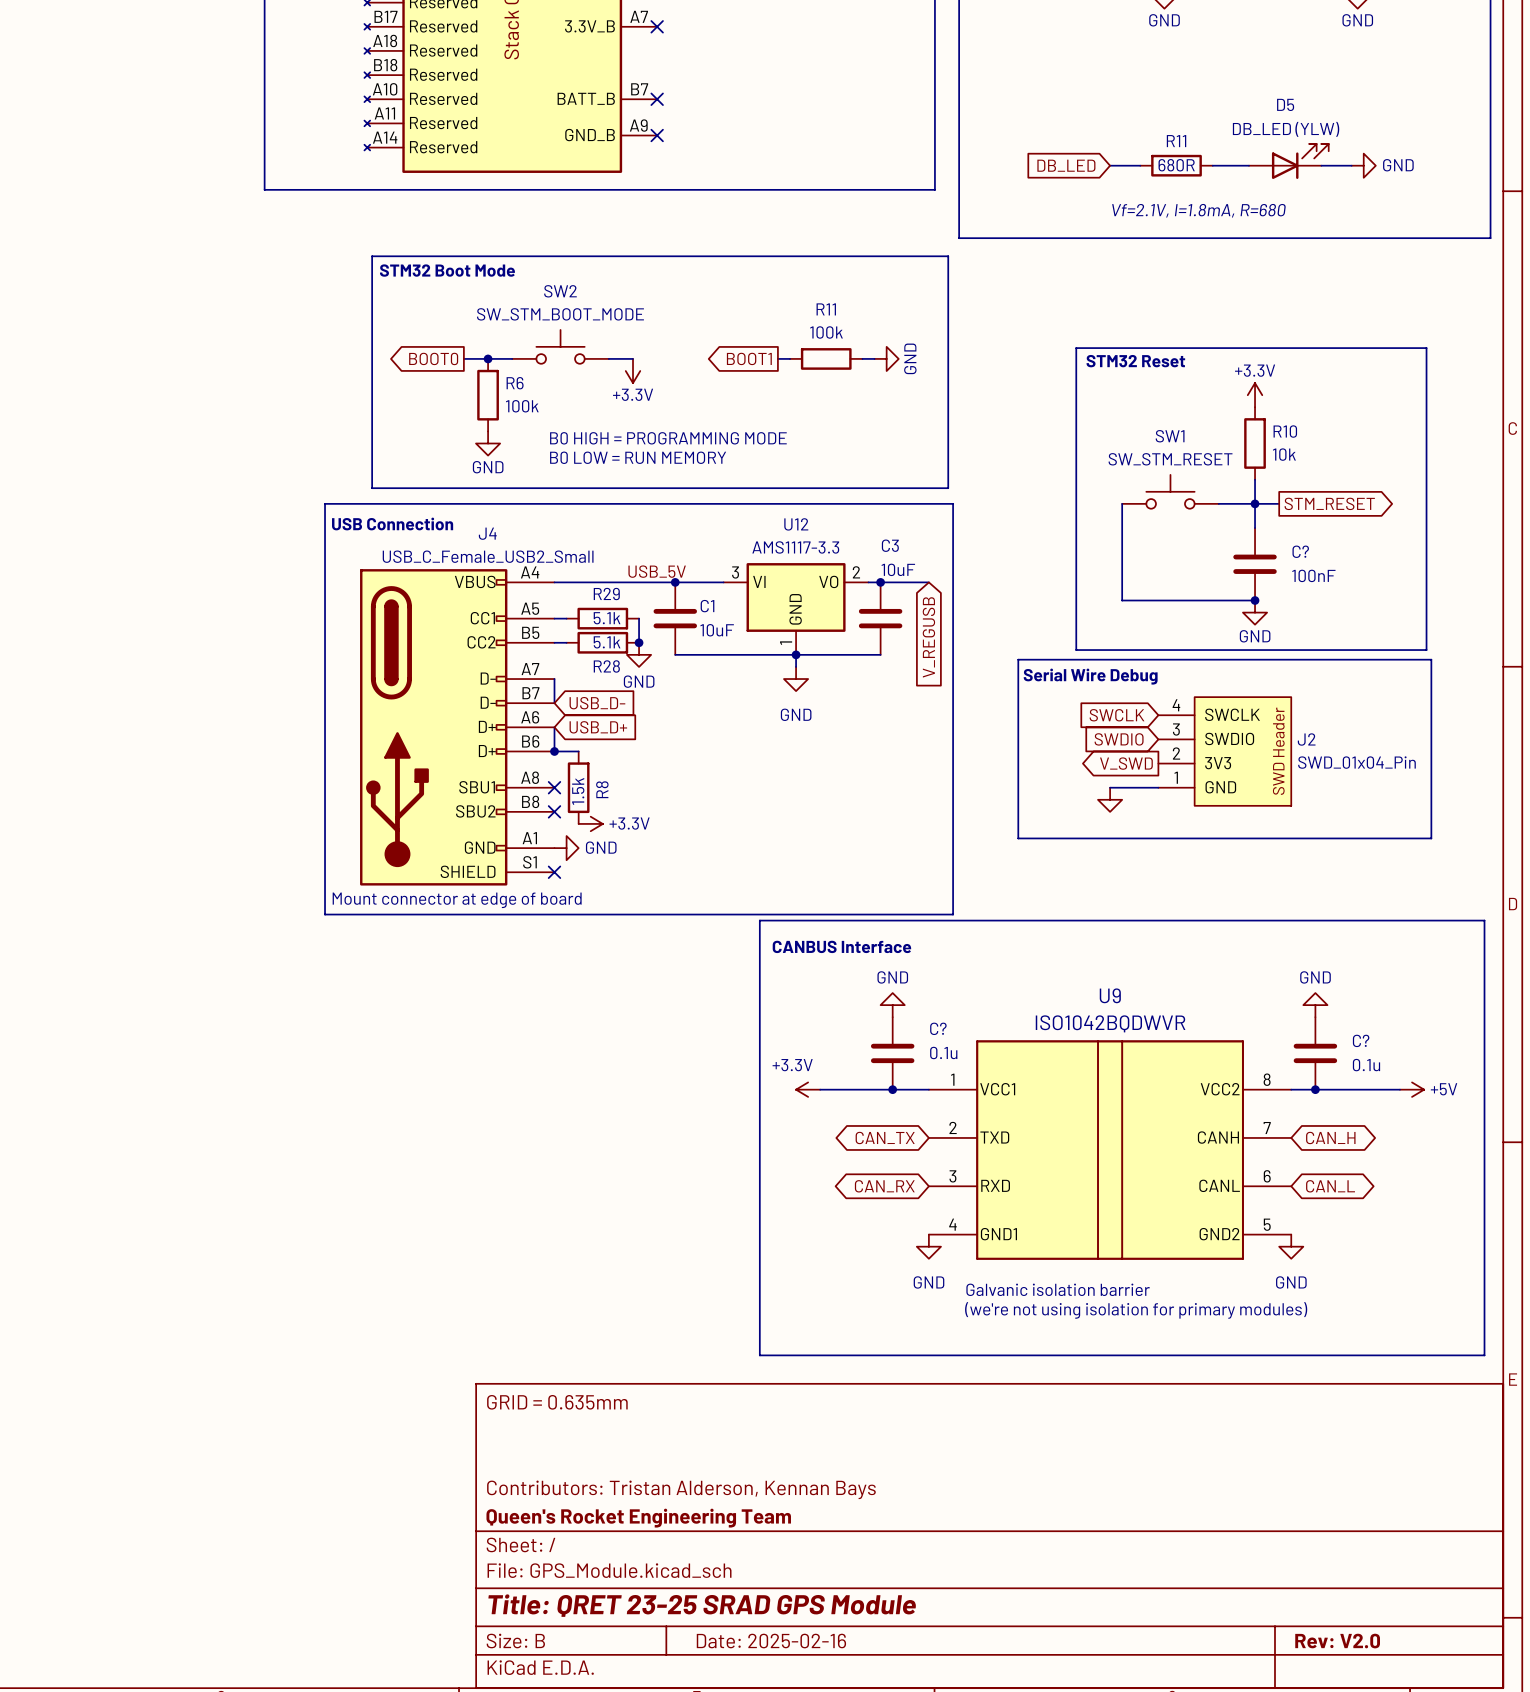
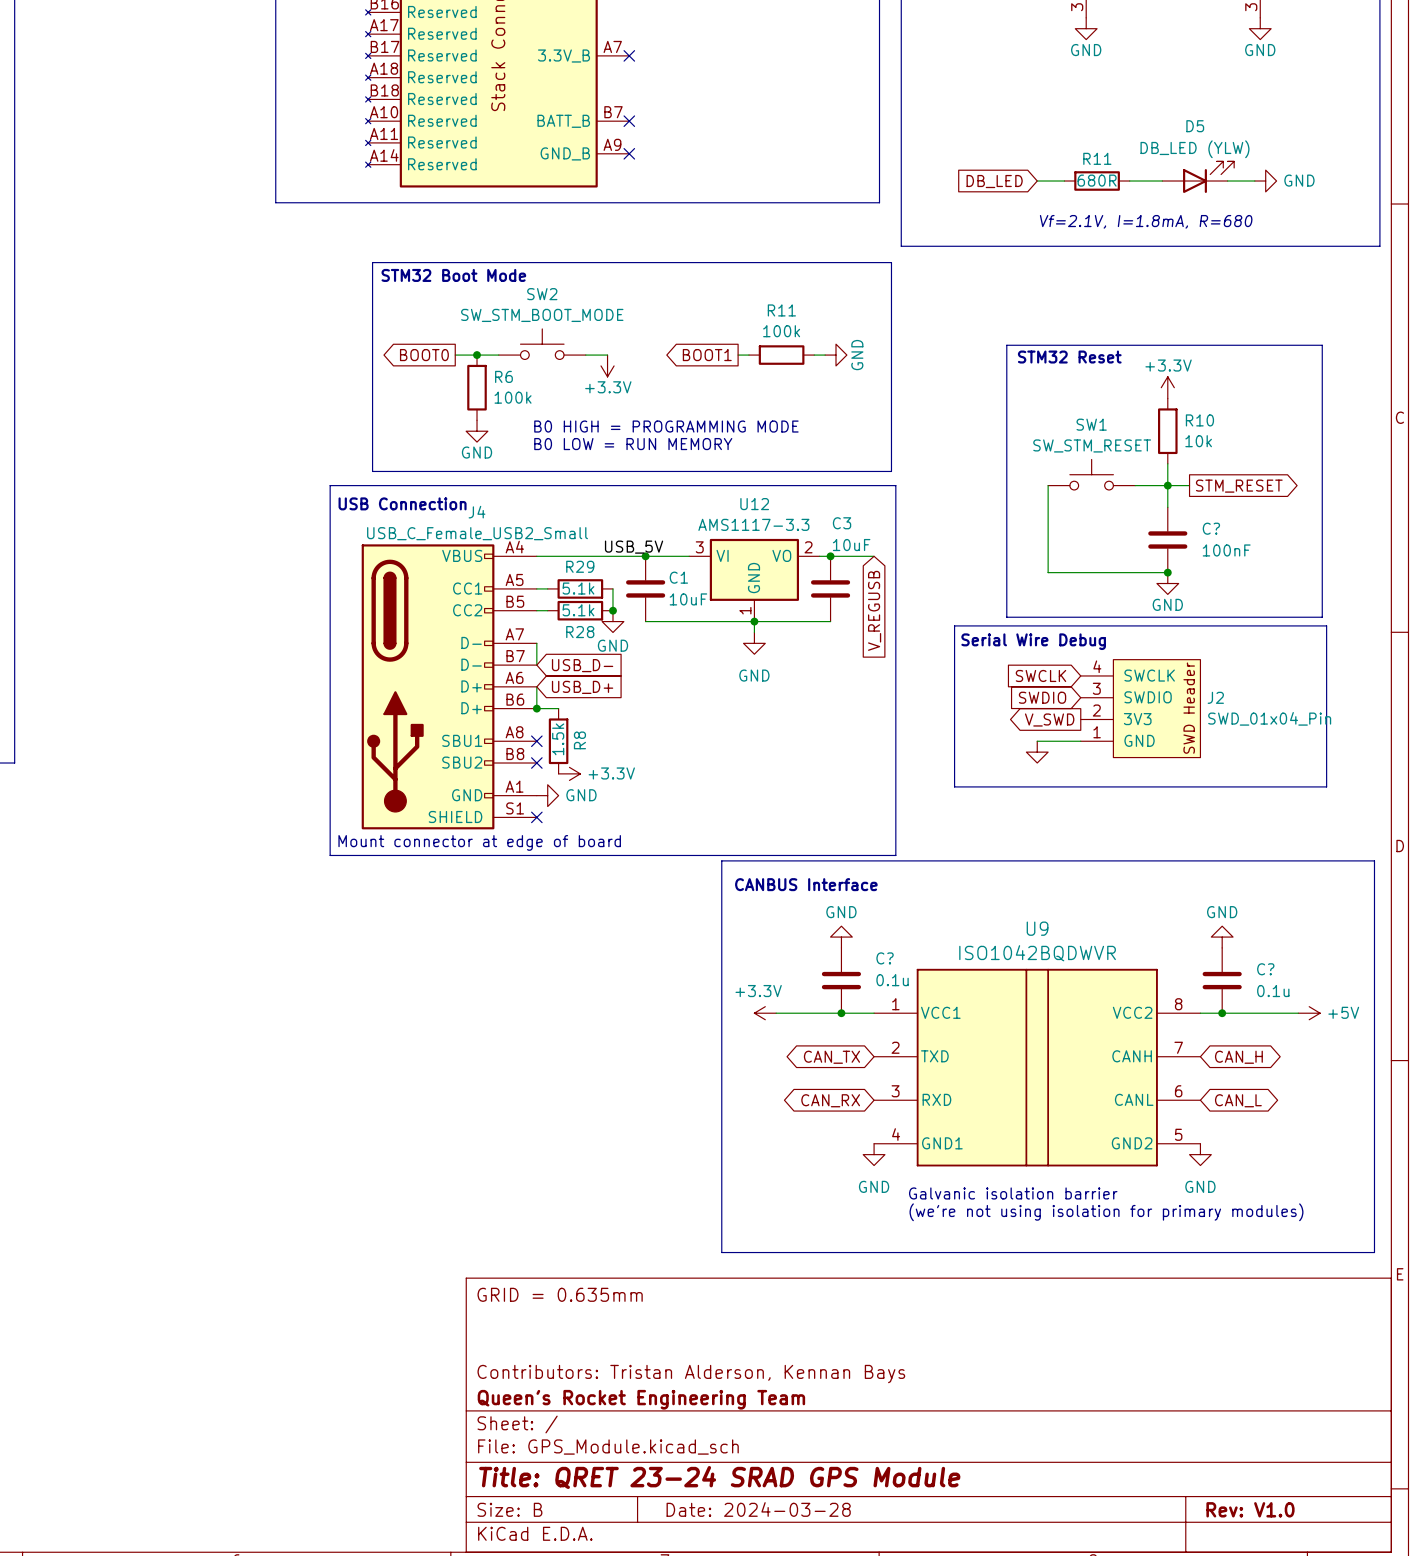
title block: Title: QRET 23-25 SRAD GPS Module (702, 1605) -> Title: QRET 23-24 SRAD GPS Module (719, 1477)
title block: Date: 2025-02-16 (771, 1641) -> Date: 2024-03-28 (758, 1509)
title block: Rev: V2.0 (1337, 1641) -> Rev: V1.0 (1250, 1509)

